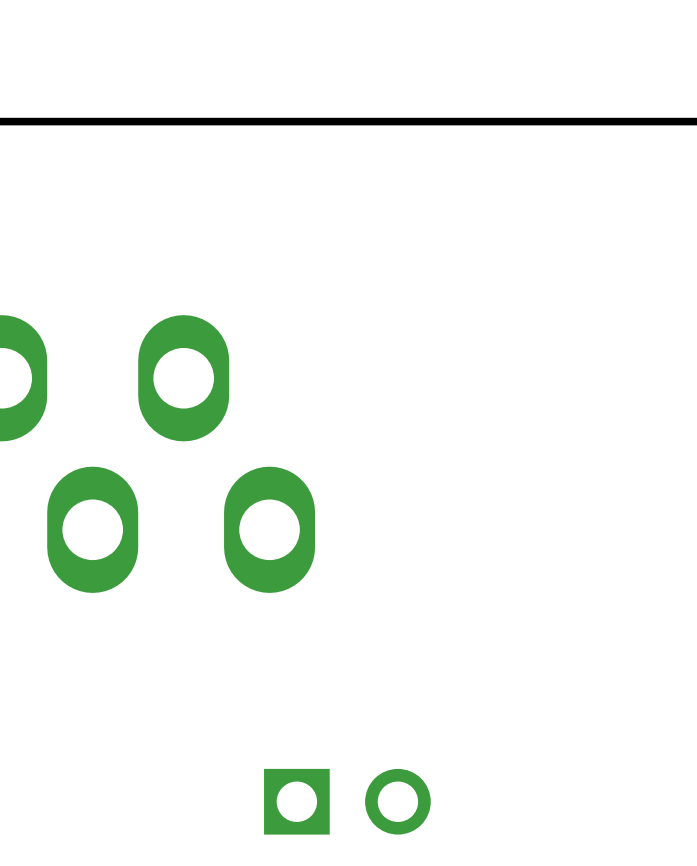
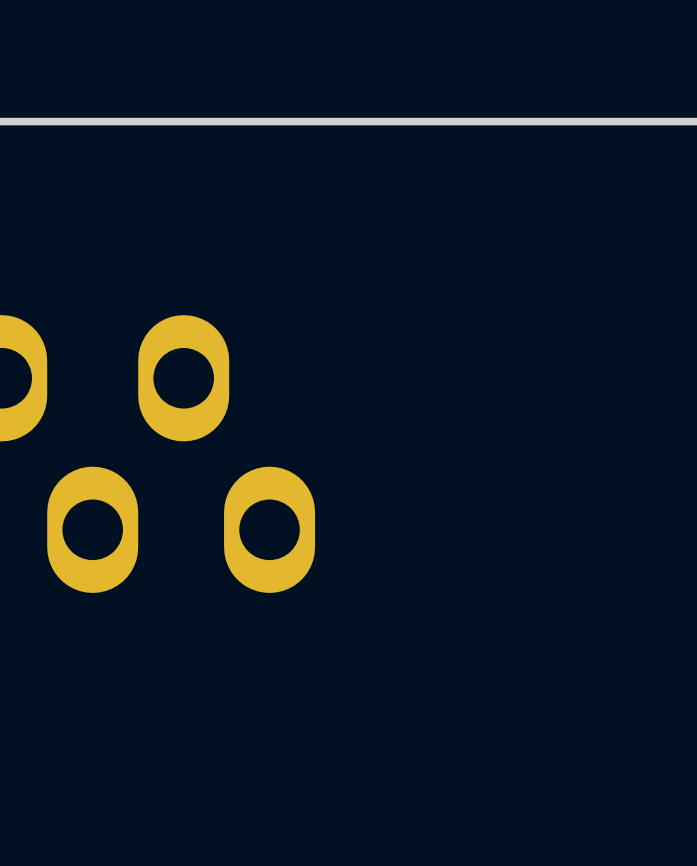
part: (347, 801) -> none

